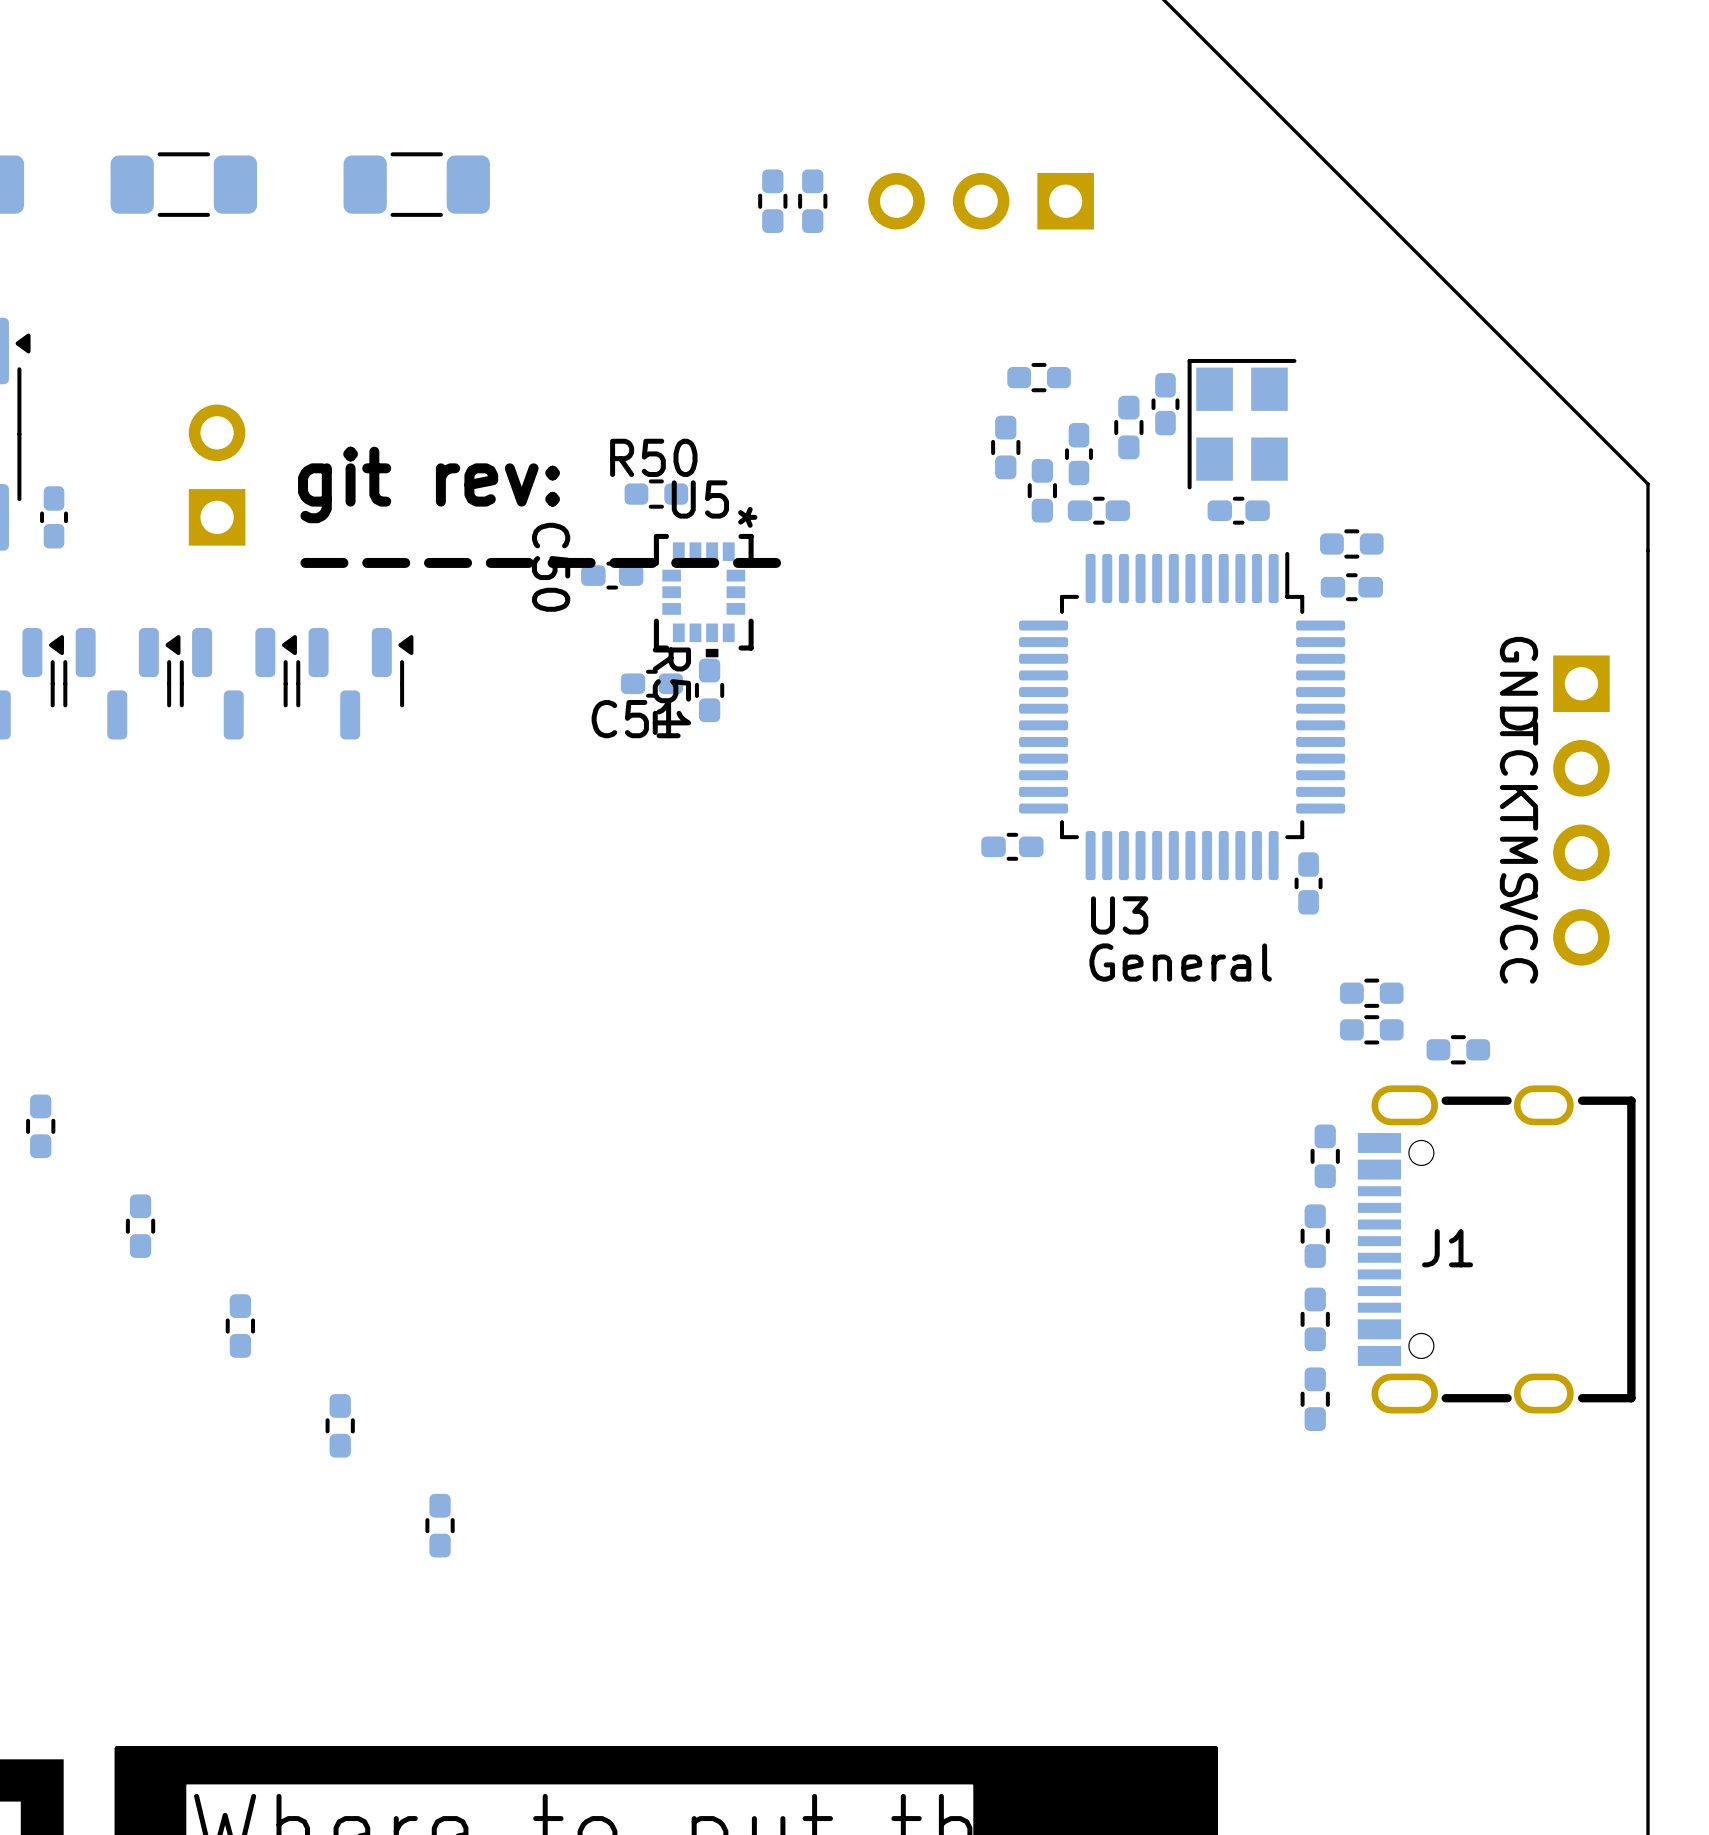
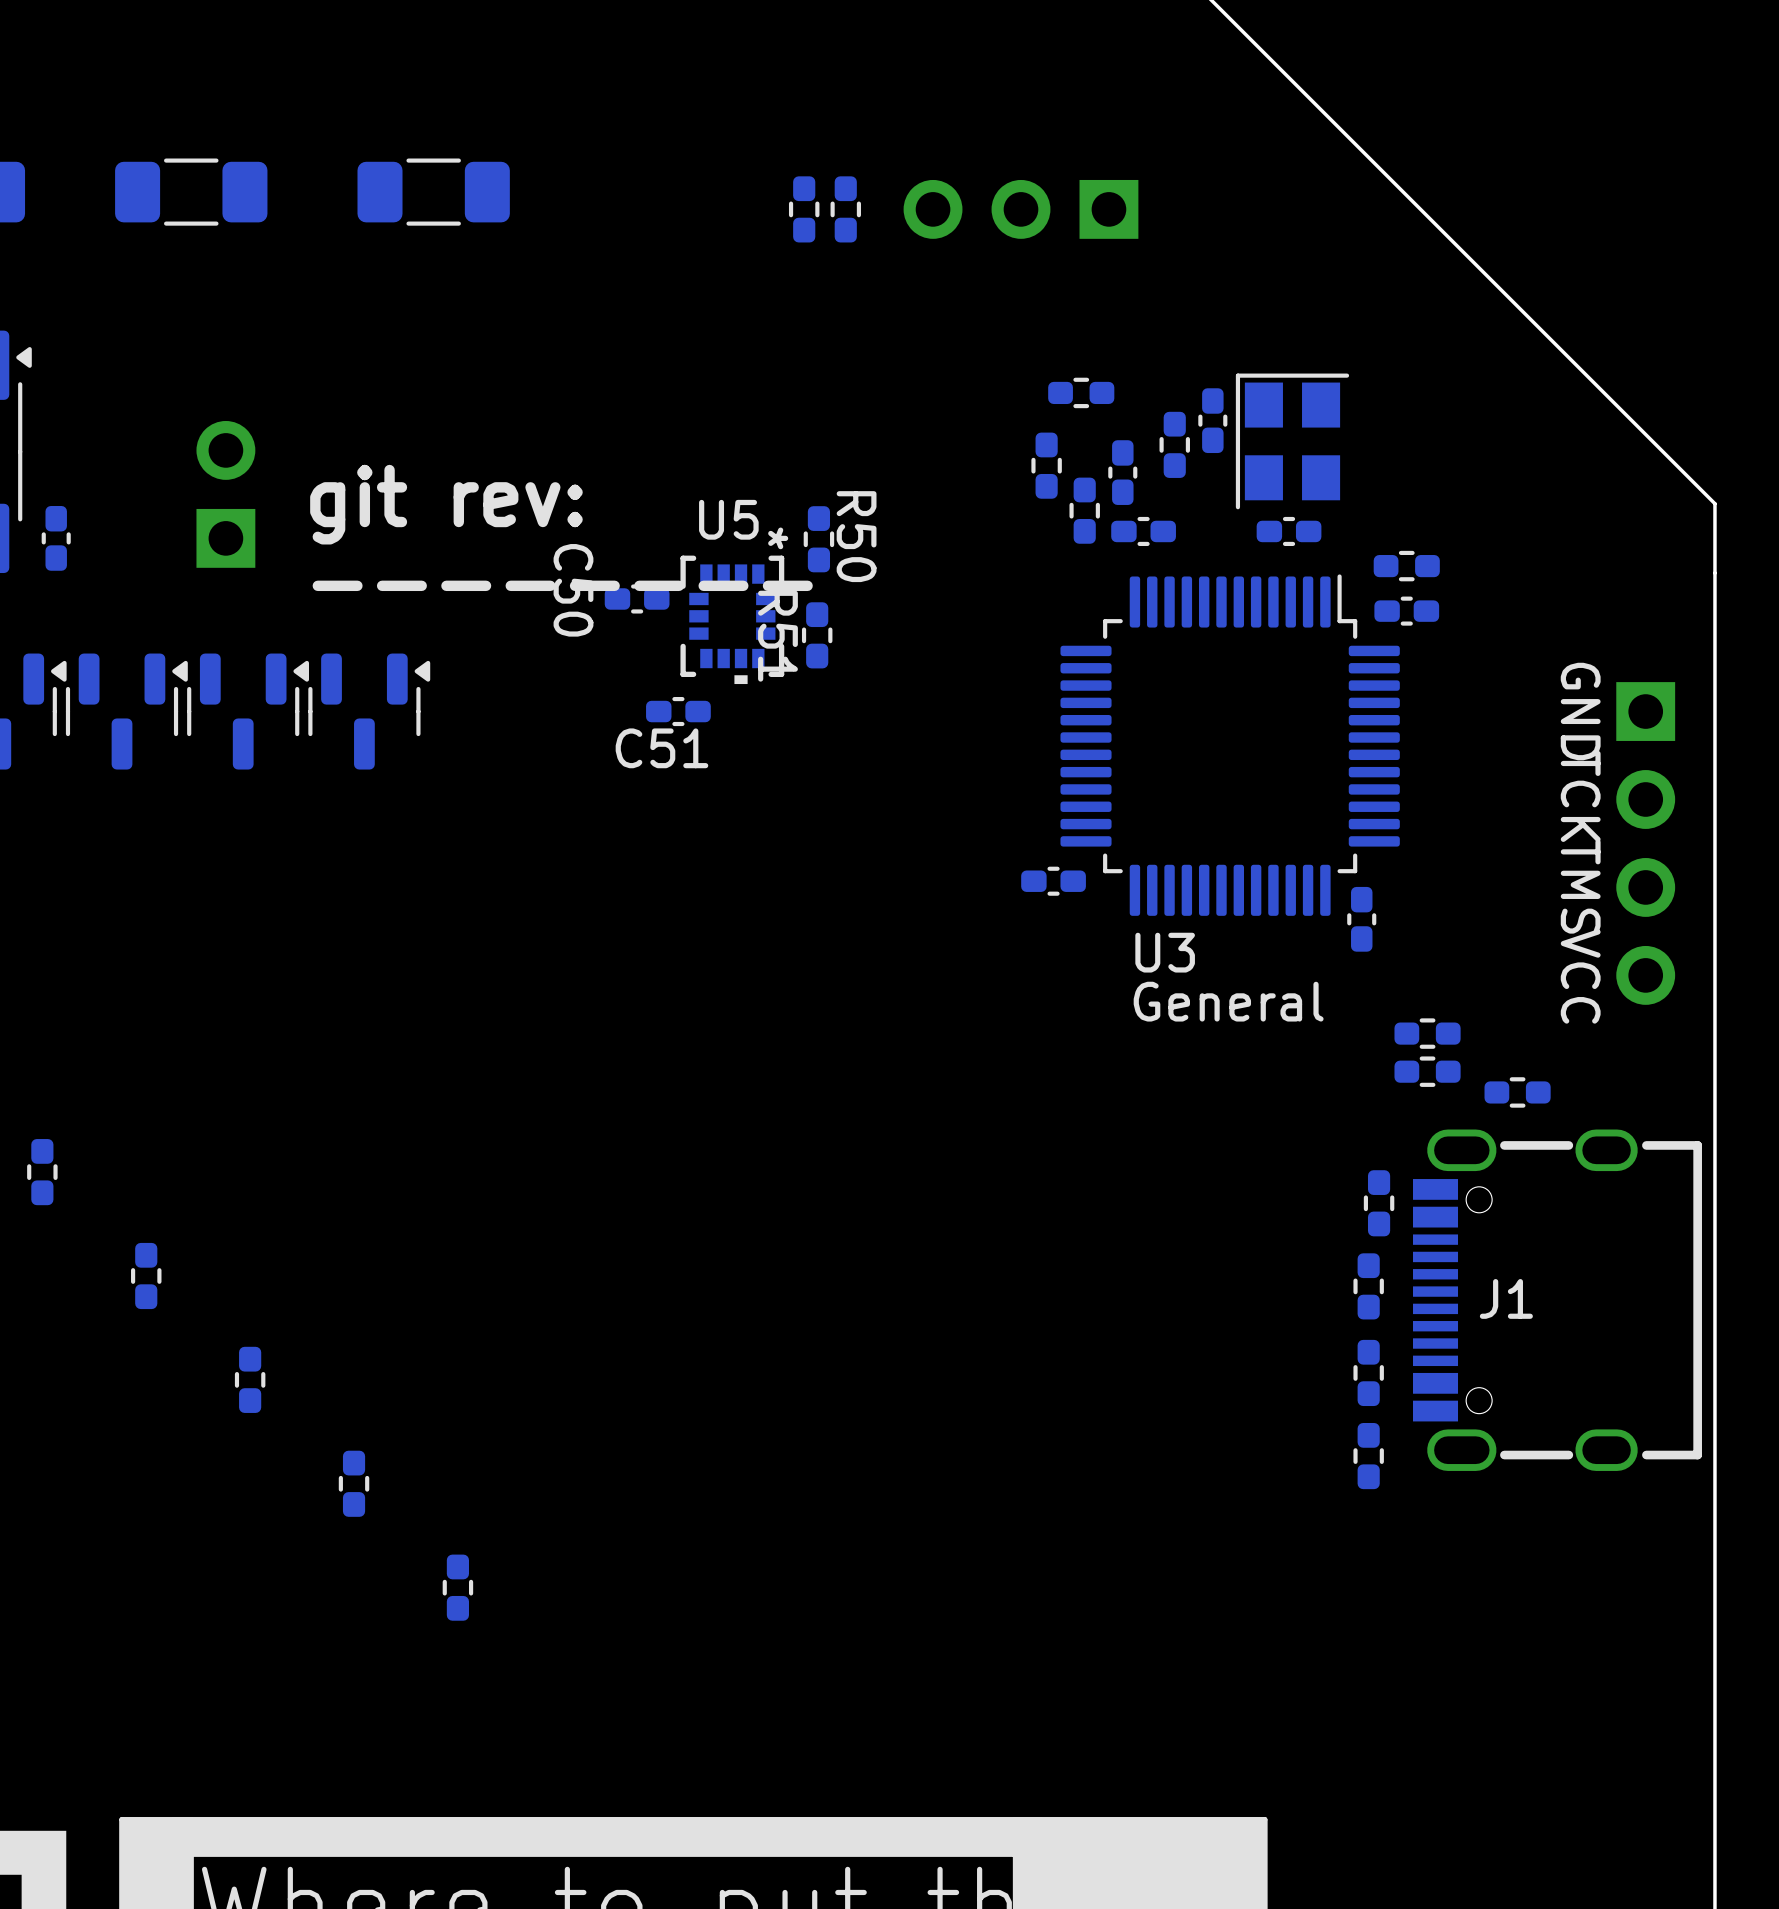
R50 rotation: 0° (656, 494) -> 90° clockwise (818, 539)
R50 position: (656, 494) -> (818, 539)
R51 position: (709, 690) -> (817, 635)

